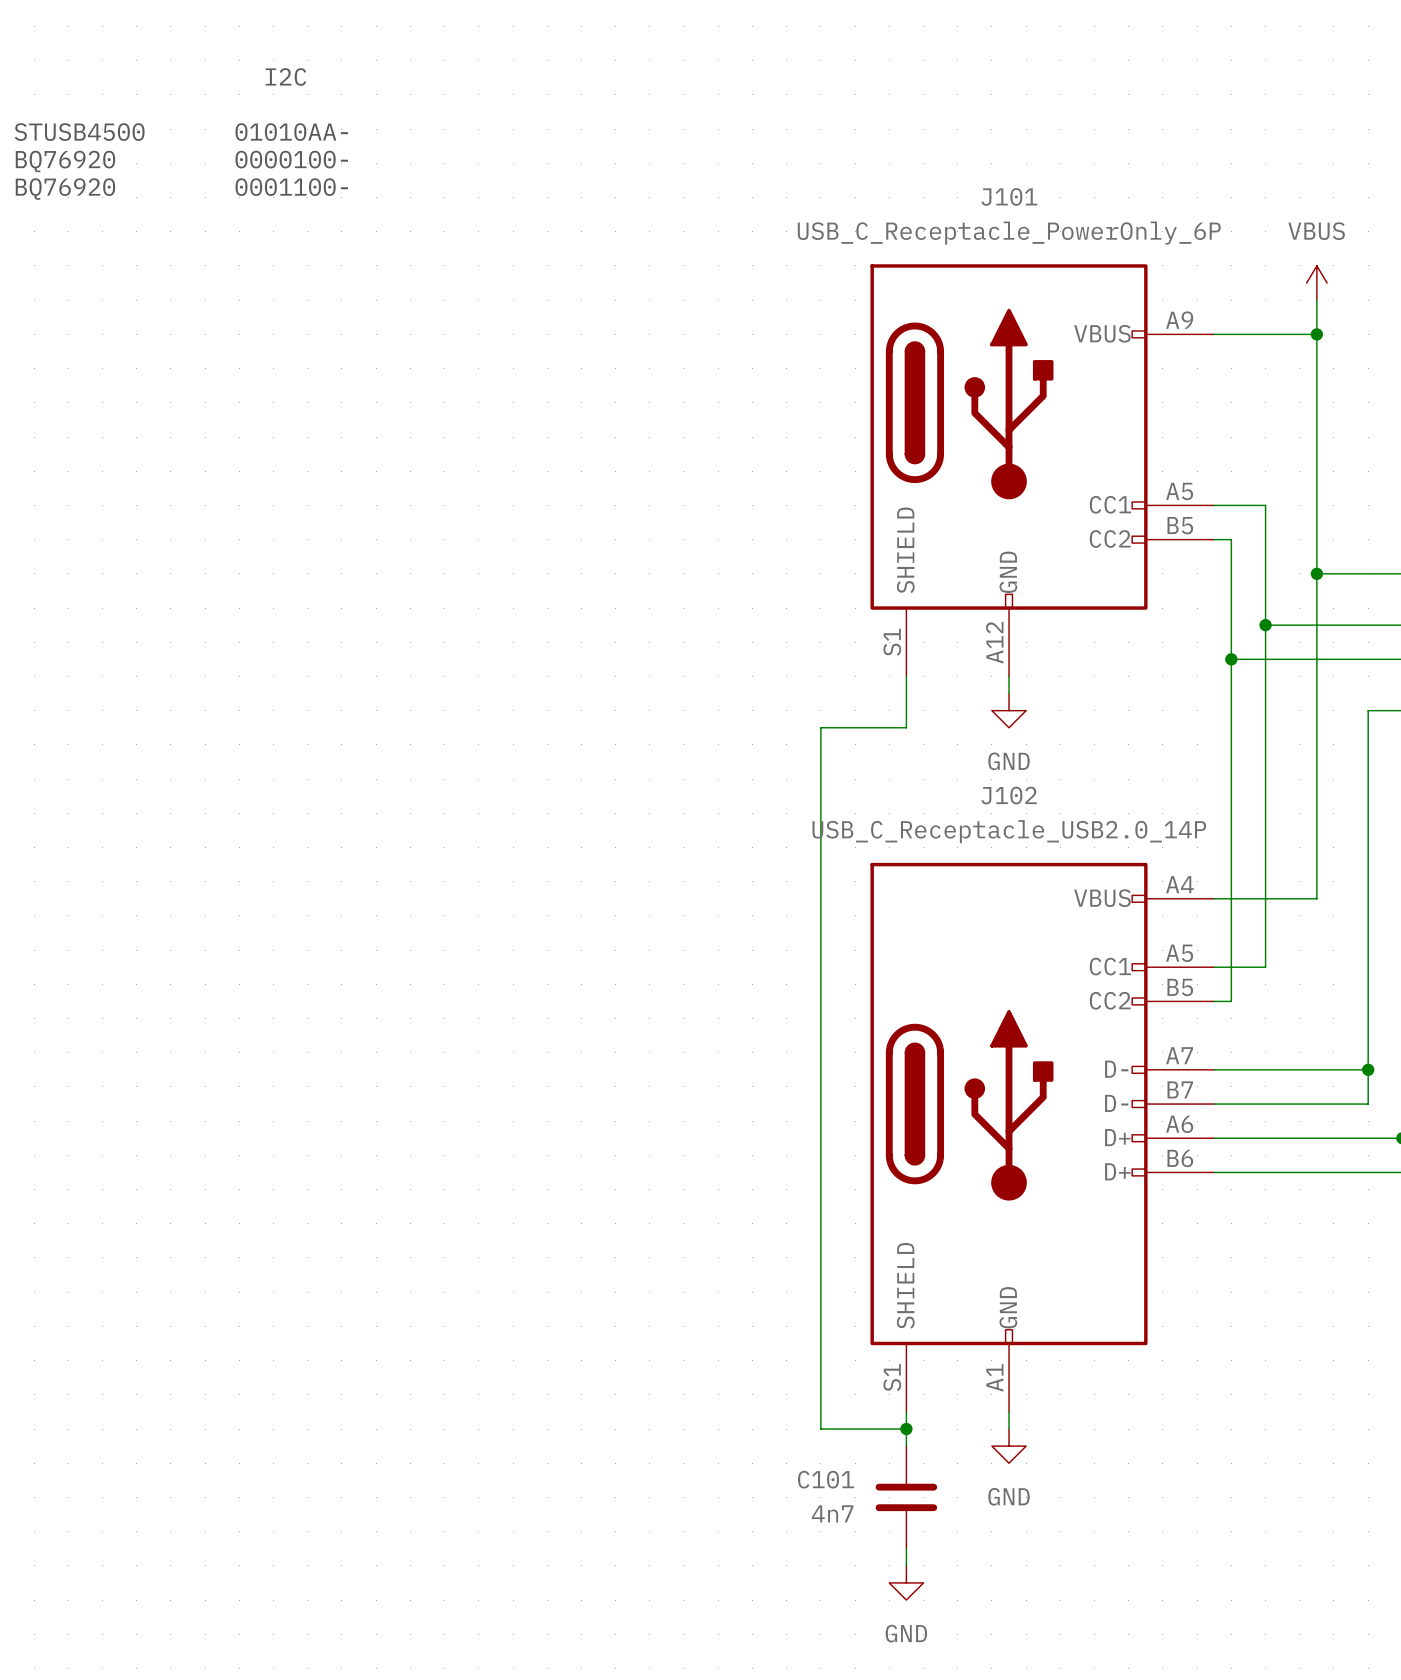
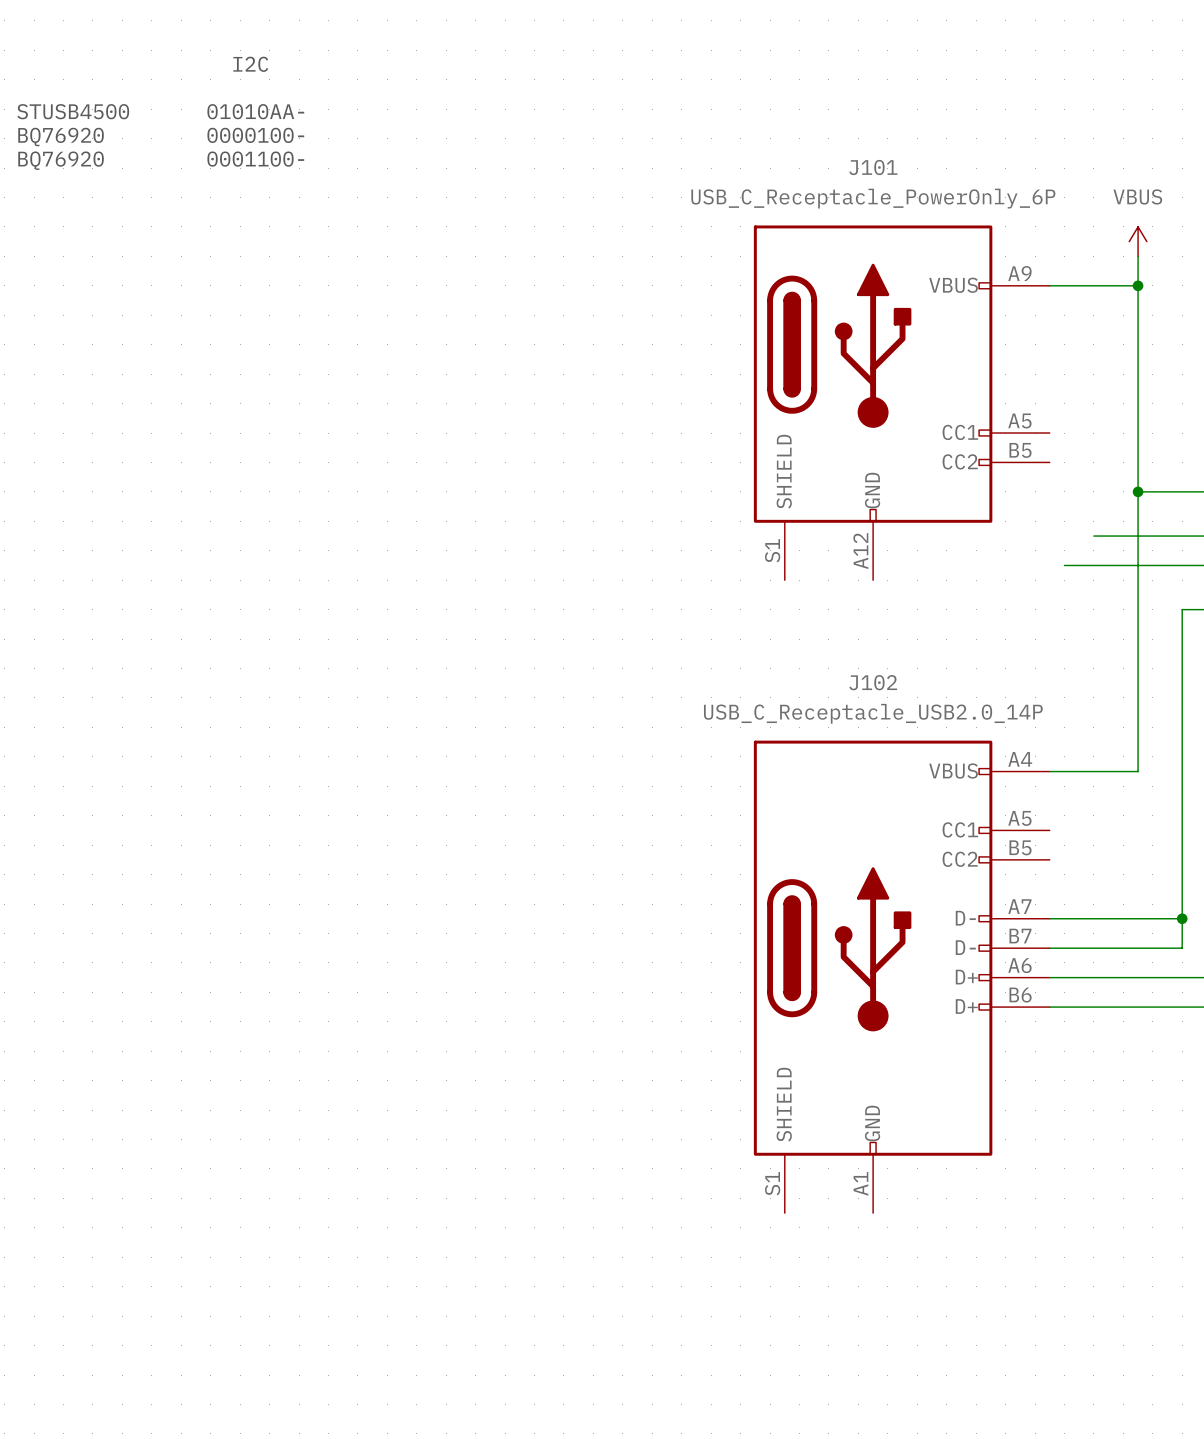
wire: (1214, 505) (1265, 505) (1265, 967) (1214, 967) -> none
wire: (1214, 539) (1231, 539) (1231, 1001) (1214, 1001) -> none
junction: (1265, 625) -> none
junction: (1231, 659) -> none
wire: (906, 676) (906, 727) (820, 727) (820, 1429) (906, 1429) -> none
wire: (1009, 676) (1009, 693) -> none
power symbol: GND (1009, 710) -> none
wire: (906, 1411) (906, 1446) -> none
wire: (1009, 1411) (1009, 1429) -> none
junction: (906, 1429) -> none
power symbol: GND (1009, 1446) -> none
C101: 4n7 (906, 1497) -> none
wire: (906, 1548) (906, 1565) -> none
power symbol: GND (906, 1582) -> none

